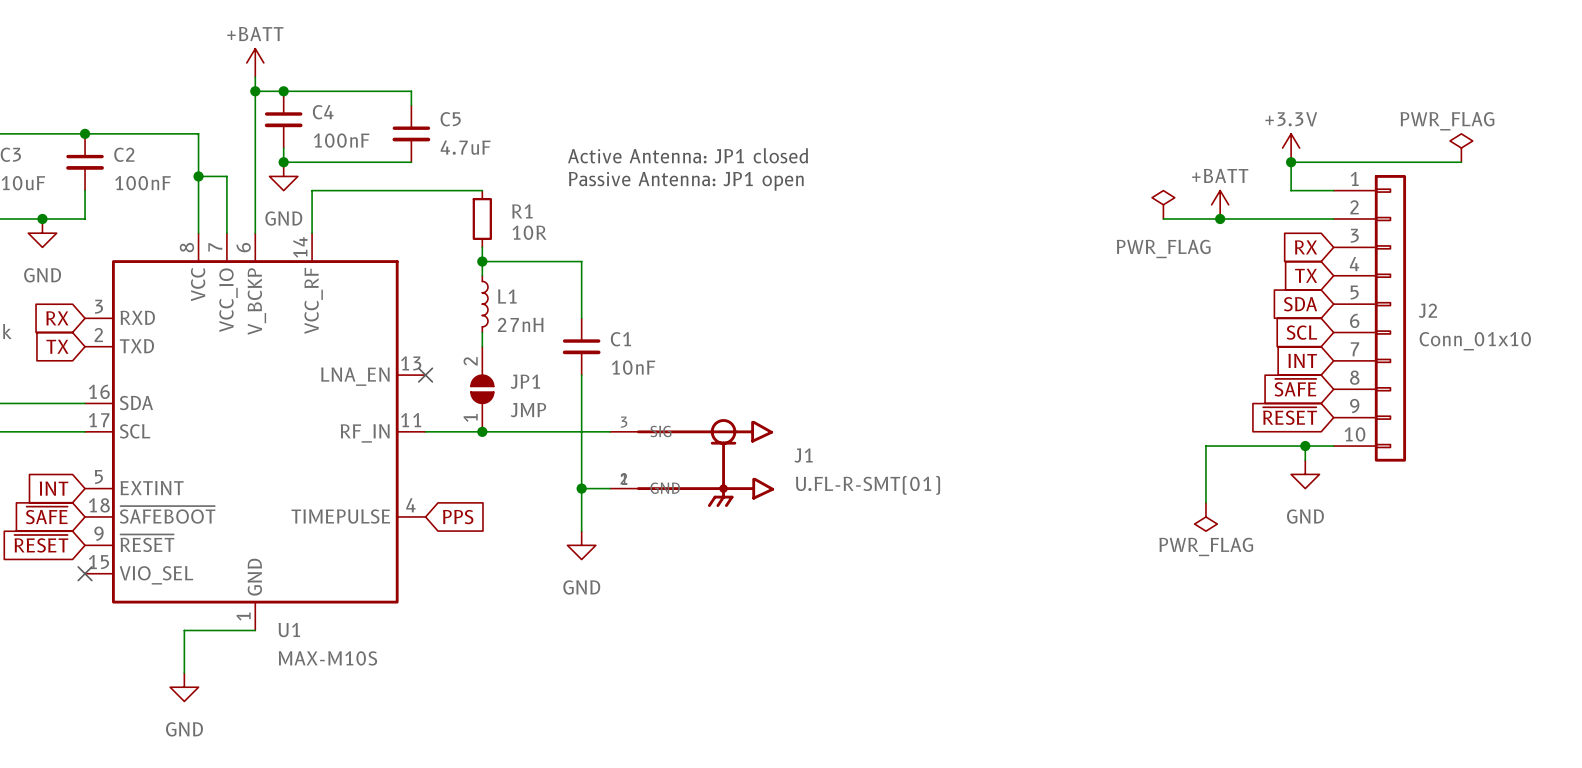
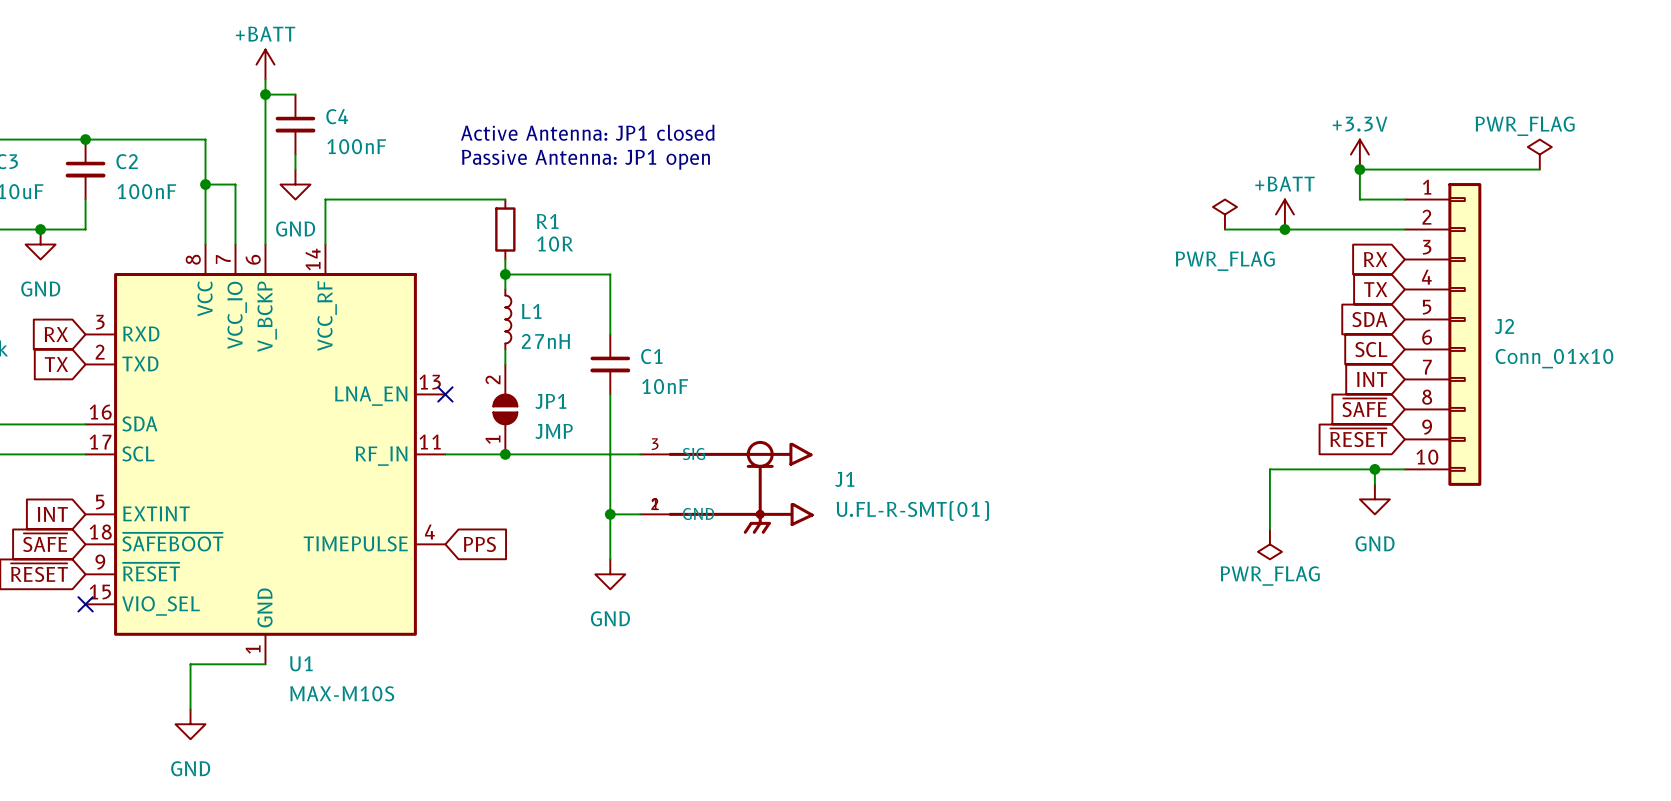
wire: (283, 91) (411, 91) (411, 105) -> none
junction: (283, 91) -> none
C5: 4.7uF (411, 133) -> none
text position: Active Antenna: JP1 closed (688, 155) -> Active Antenna: JP1 closed (587, 132)
wire: (283, 162) (411, 162) -> none
junction: (283, 162) -> none
text position: Passive Antenna: JP1 open (686, 181) -> Passive Antenna: JP1 open (585, 159)

